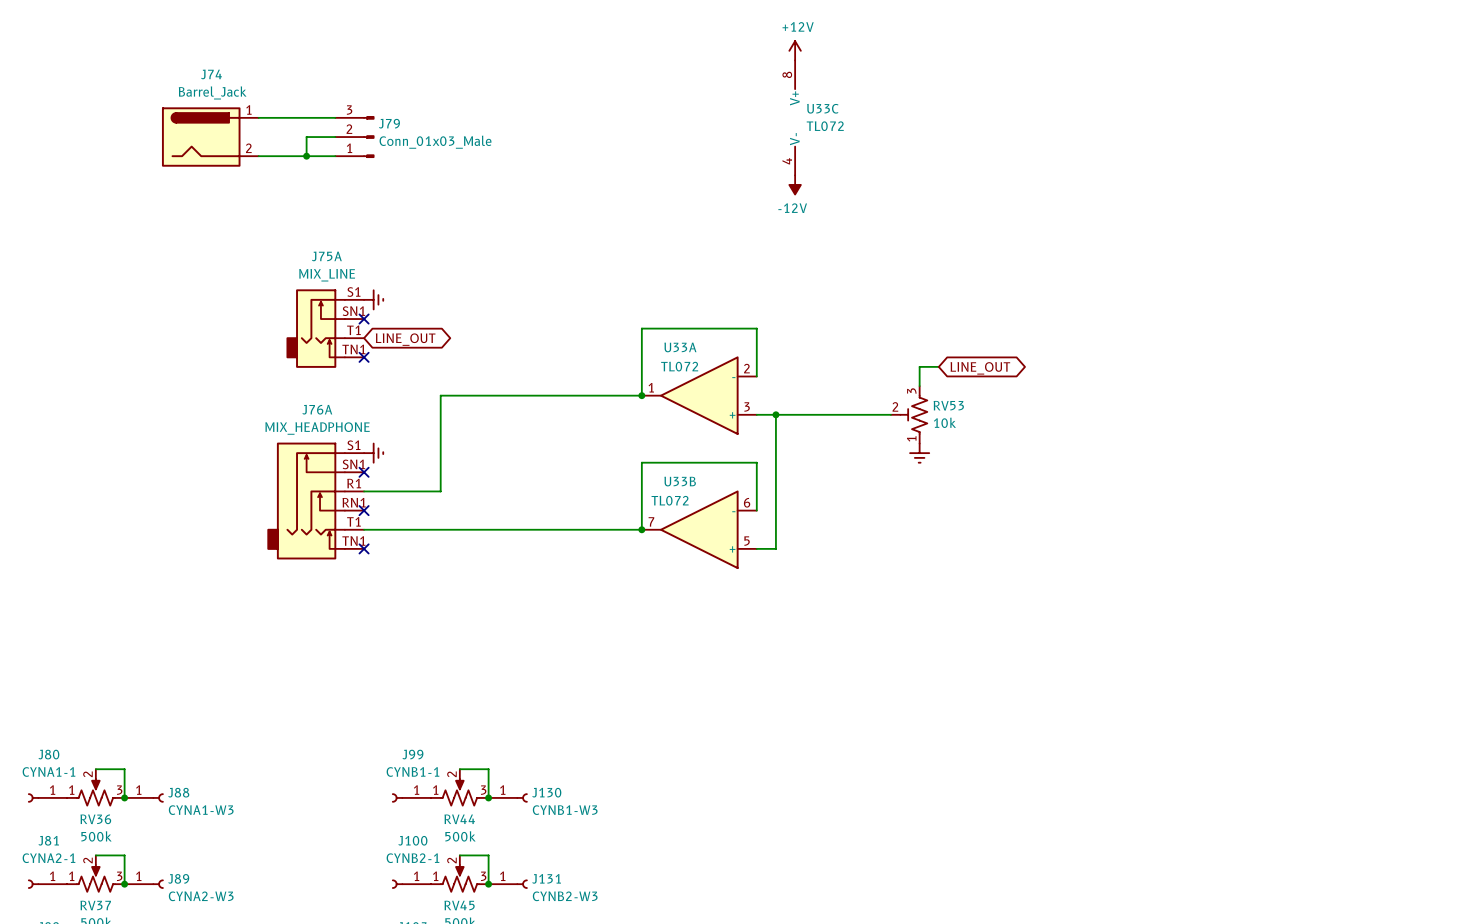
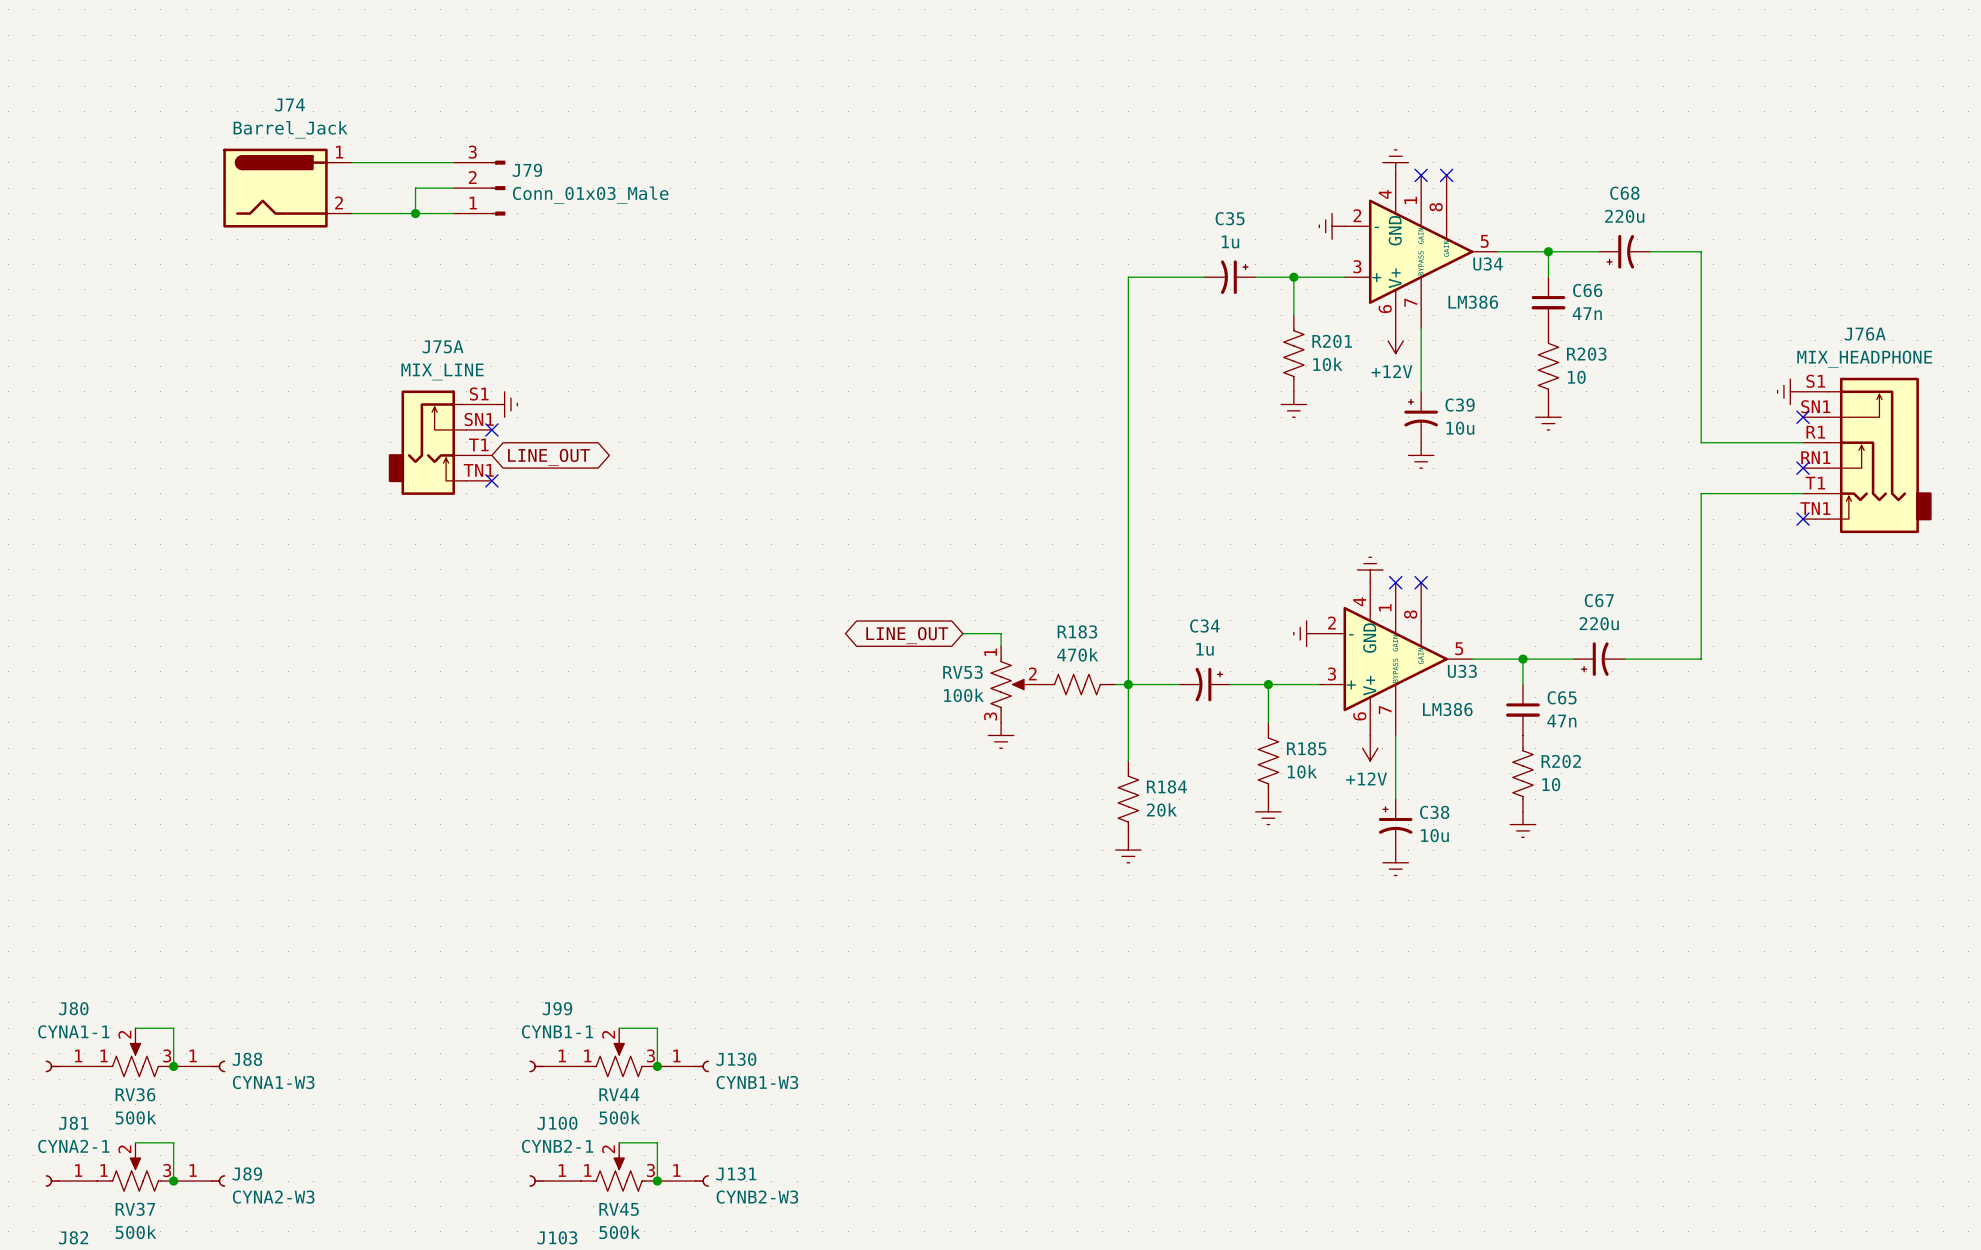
power symbol: +12V (795, 50) -> none
U33C: TL072 (795, 117) -> none
power symbol: none -> (1395, 162)
no-connect mark: none -> (1421, 175)
no-connect mark: none -> (1446, 175)
power symbol: none -> (1332, 226)
power symbol: -12V (795, 184) -> none
U34: none -> LM386 (1421, 251)
wire: none -> (1497, 251) (1599, 251)
wire: none -> (1548, 251) (1548, 277)
junction: none -> (1548, 251)
C68: none -> 220u (1624, 251)
wire: none -> (1650, 251) (1701, 251) (1701, 442) (1803, 442)
wire: none -> (1204, 277) (1128, 277) (1128, 760)
C35: none -> 1u (1230, 277)
wire: none -> (1255, 277) (1344, 277)
wire: none -> (1293, 277) (1293, 315)
junction: none -> (1293, 277)
C66: none -> 47n (1548, 302)
wire: none -> (1421, 328) (1421, 391)
power symbol: none -> +12V (1395, 340)
R201: none -> 10k (1293, 353)
R203: none -> 10 (1548, 366)
power symbol: none -> (1790, 391)
power symbol: none -> (1293, 404)
C39: none -> 10u (1421, 417)
power symbol: none -> (1548, 417)
no-connect mark: none -> (1803, 417)
power symbol: none -> (1421, 455)
no-connect mark: none -> (1803, 468)
wire: (938, 366) (919, 366) (919, 386) -> none
wire: none -> (1803, 493) (1701, 493) (1701, 659) (1624, 659)
global label: LINE_OUT (980, 368) -> none
wire: (756, 376) (756, 328) (641, 328) (641, 395) (440, 395) (440, 491) (364, 491) -> none
RV53 symbol: [890, 386, 928, 444] -> [990, 646, 1040, 723]
no-connect mark: none -> (1803, 519)
junction: (641, 395) -> none
U33A: TL072 (699, 395) -> none
RV53 name position: RV53 (948, 405) -> RV53 (962, 672)
wire: (756, 414) (890, 414) -> none
wire: (775, 414) (775, 548) (756, 548) -> none
junction: (775, 414) -> none
RV53 value: 10k (944, 422) -> 100k (963, 695)
power symbol: none -> (1370, 569)
no-connect mark: none -> (1395, 582)
no-connect mark: none -> (1421, 582)
power symbol: (373, 453) -> none
power symbol: (919, 453) -> none
no-connect mark: (364, 472) -> none
wire: none -> (962, 633) (1001, 633) (1001, 646)
power symbol: none -> (1306, 633)
global label: none -> LINE_OUT (907, 635)
U33: none -> LM386 (1395, 659)
wire: none -> (1472, 659) (1573, 659)
wire: none -> (1522, 659) (1522, 684)
junction: none -> (1522, 659)
C67: none -> 220u (1599, 659)
J76A flip: as is (306, 501) -> left-right (1880, 455)
J76A position: (315, 501) -> (1867, 455)
no-connect mark: (364, 510) -> none
wire: (756, 510) (756, 462) (641, 462) (641, 529) (364, 529) -> none
R183: none -> 470k (1077, 684)
wire: none -> (1115, 684) (1179, 684)
junction: none -> (1128, 684)
C34: none -> 1u (1204, 684)
wire: none -> (1230, 684) (1319, 684)
wire: none -> (1268, 684) (1268, 722)
junction: none -> (1268, 684)
junction: (641, 529) -> none
U33B: TL072 (699, 529) -> none
C65: none -> 47n (1522, 710)
no-connect mark: (364, 548) -> none
power symbol: none -> (1001, 735)
wire: none -> (1395, 735) (1395, 799)
power symbol: none -> +12V (1370, 748)
R185: none -> 10k (1268, 760)
R202: none -> 10 (1522, 773)
R184: none -> 20k (1128, 799)
power symbol: none -> (1268, 811)
C38: none -> 10u (1395, 824)
power symbol: none -> (1522, 824)
power symbol: none -> (1128, 850)
power symbol: none -> (1395, 862)

